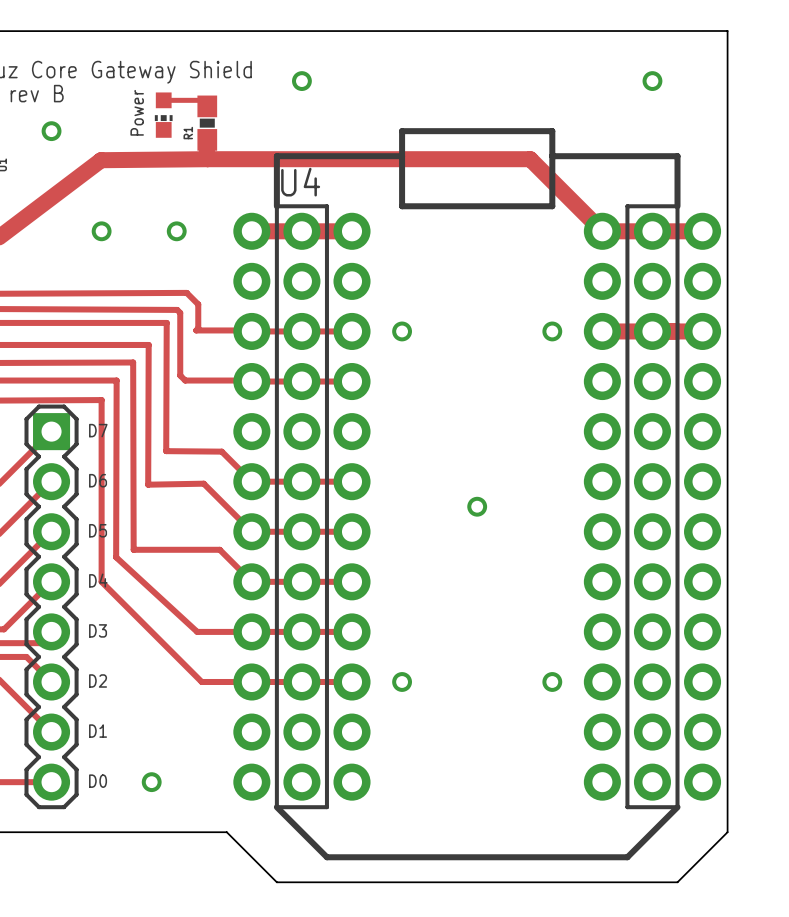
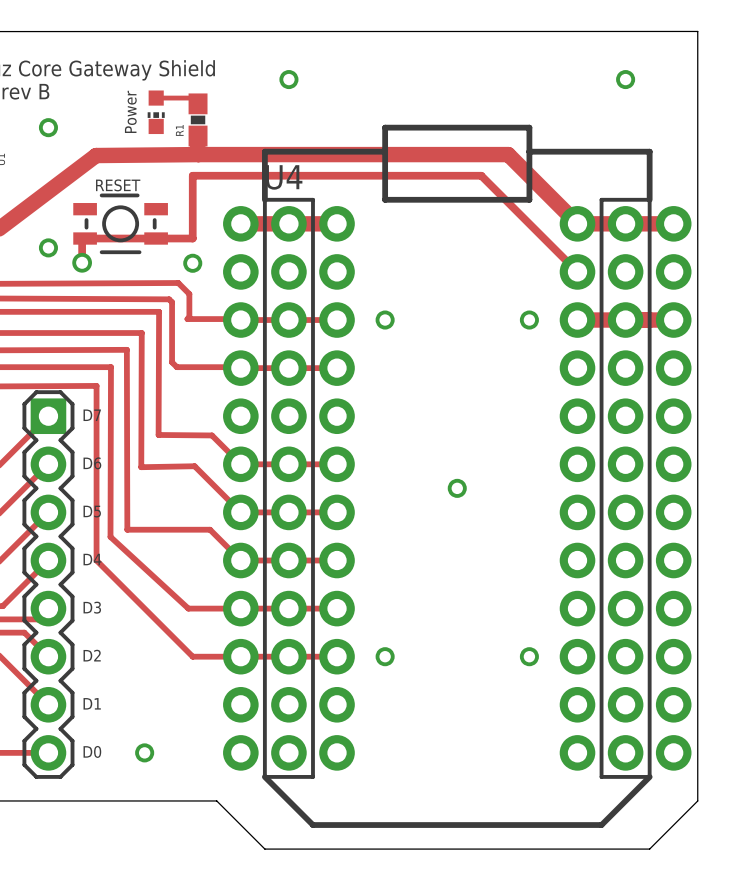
via: (101, 231) -> none
RESET: none -> (120, 223)
via position: (176, 231) -> (192, 263)
via: none -> (48, 247)
track: none -> (82, 262) (82, 241) (85, 238) (192, 238) (192, 175) (481, 175) (577, 271)
via: none -> (82, 262)

